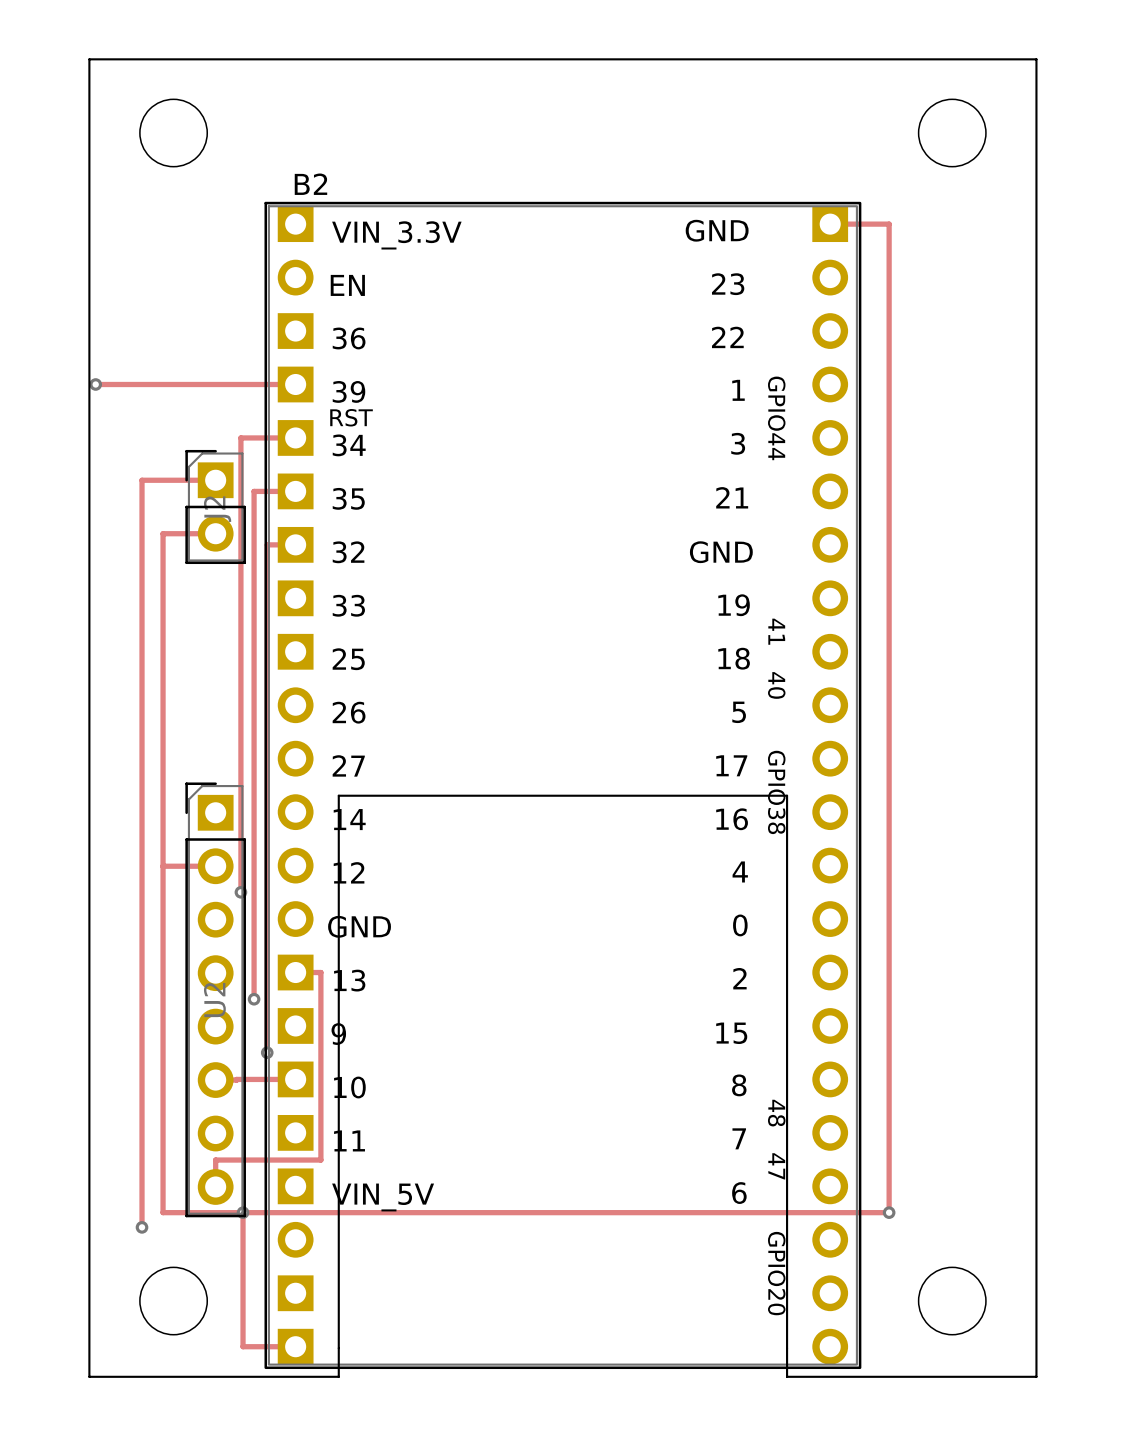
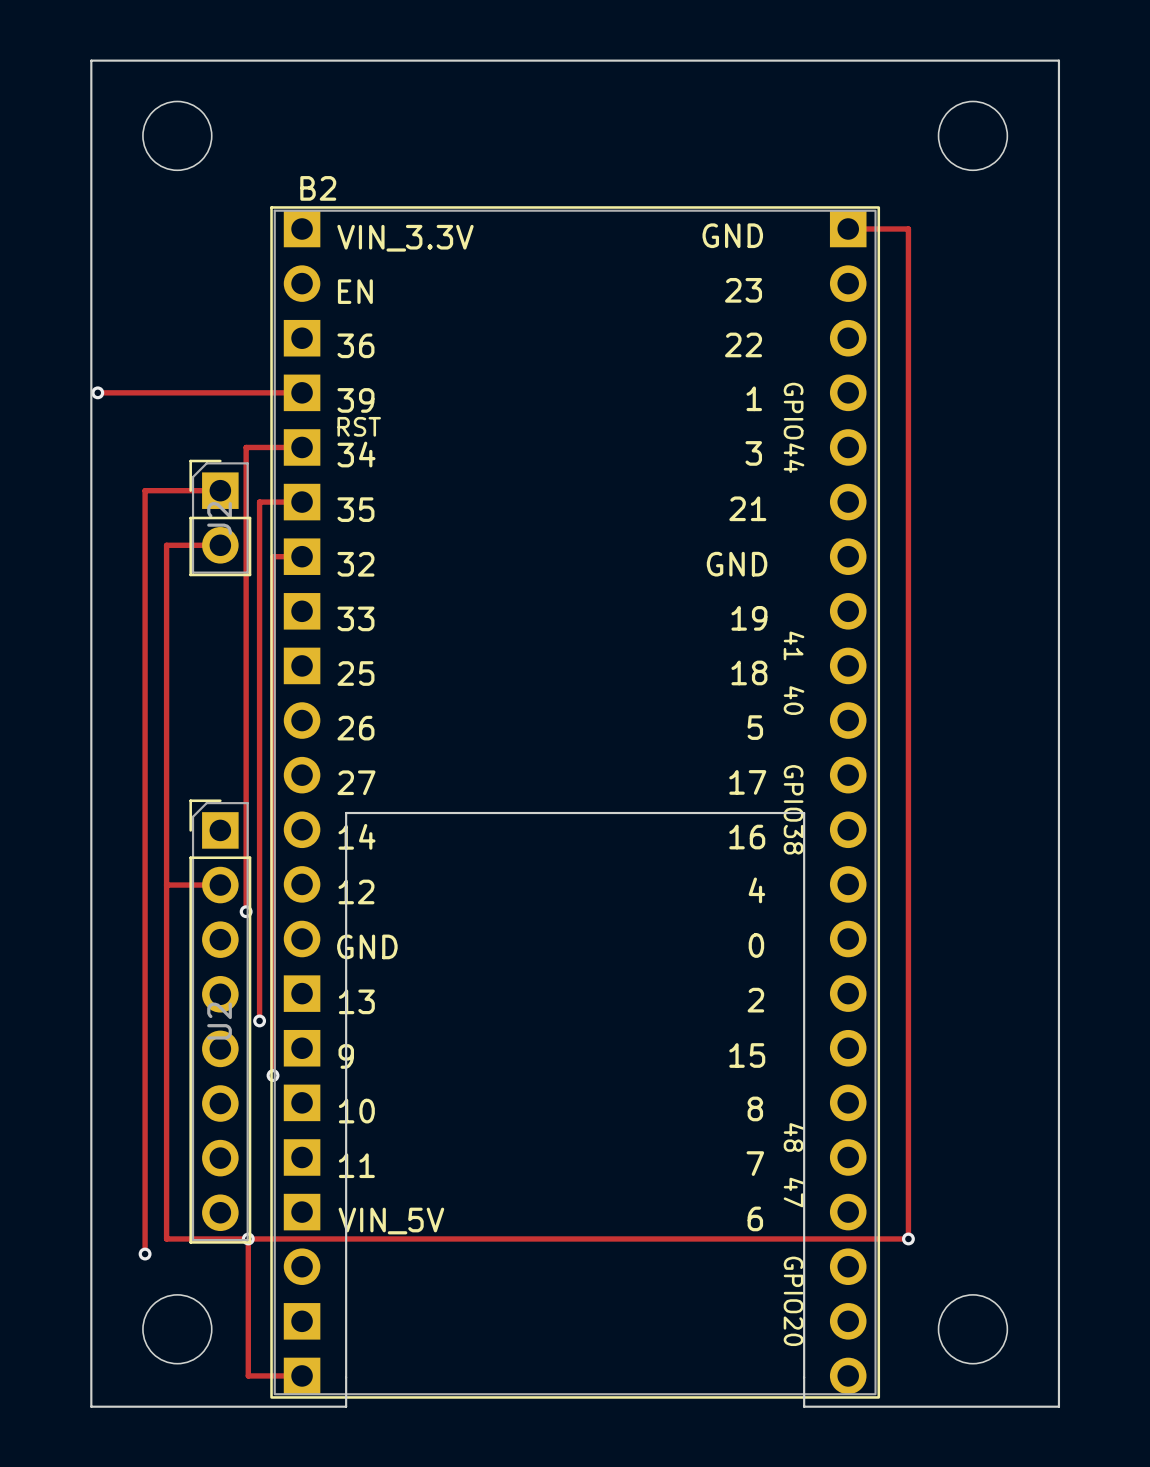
track: (295, 972) (320, 972) (320, 1160) (215, 1160) (215, 1186) -> none
track: (295, 1079) (215, 1080) -> none

